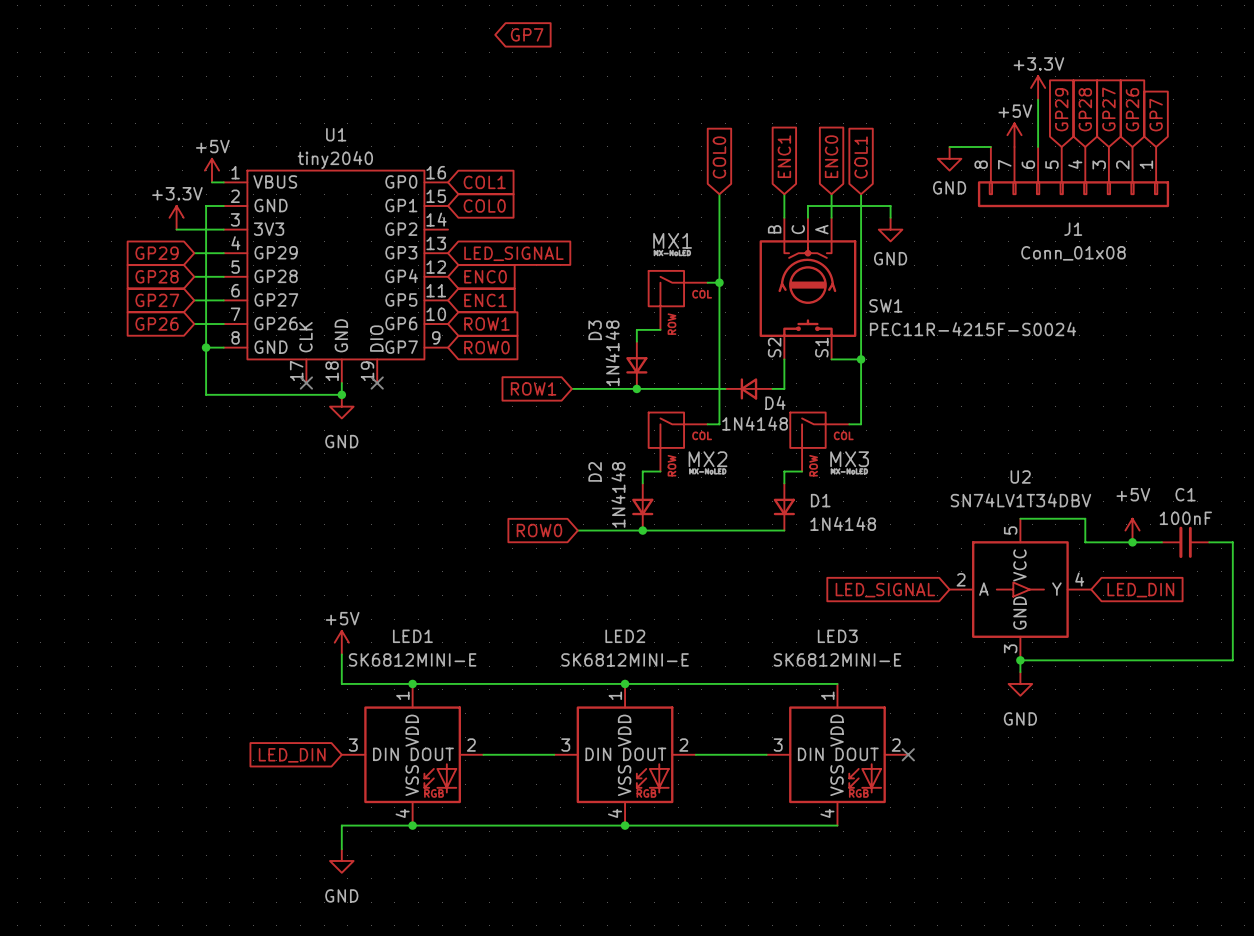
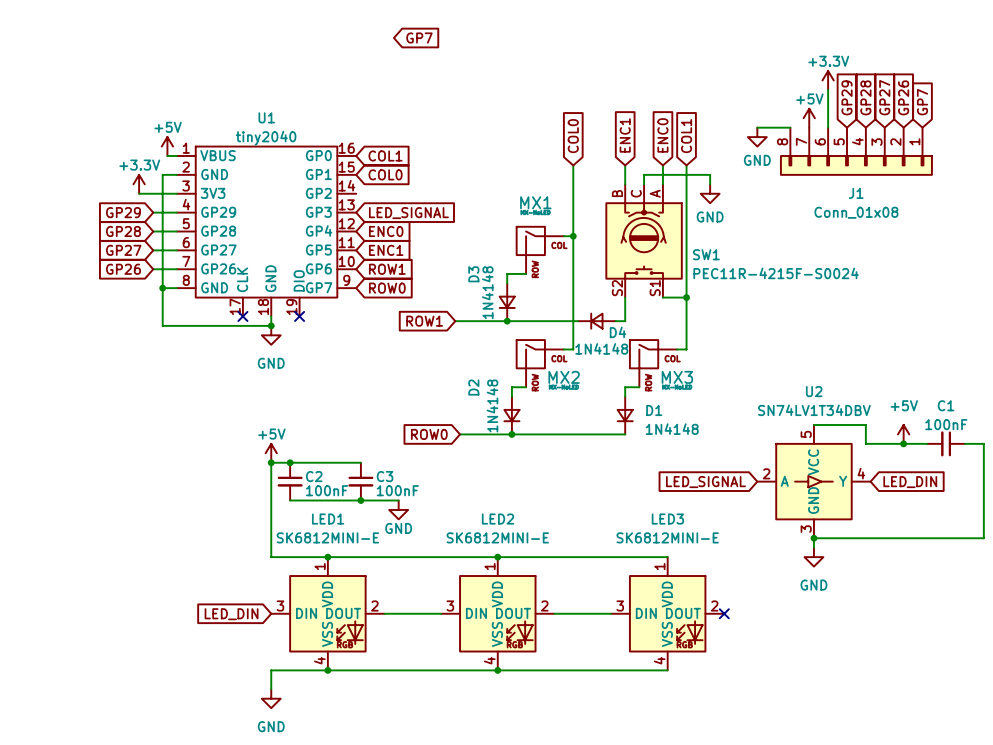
junction: none -> (271, 462)
junction: none -> (290, 462)
wire: none -> (360, 462) (271, 462) (271, 533)
C2: none -> 100nF (290, 481)
C3: none -> 100nF (360, 481)
wire: none -> (290, 500) (398, 500)
junction: none -> (360, 500)
power symbol: none -> GND (398, 509)
power symbol position: +5V (341, 642) -> +5V (271, 453)

